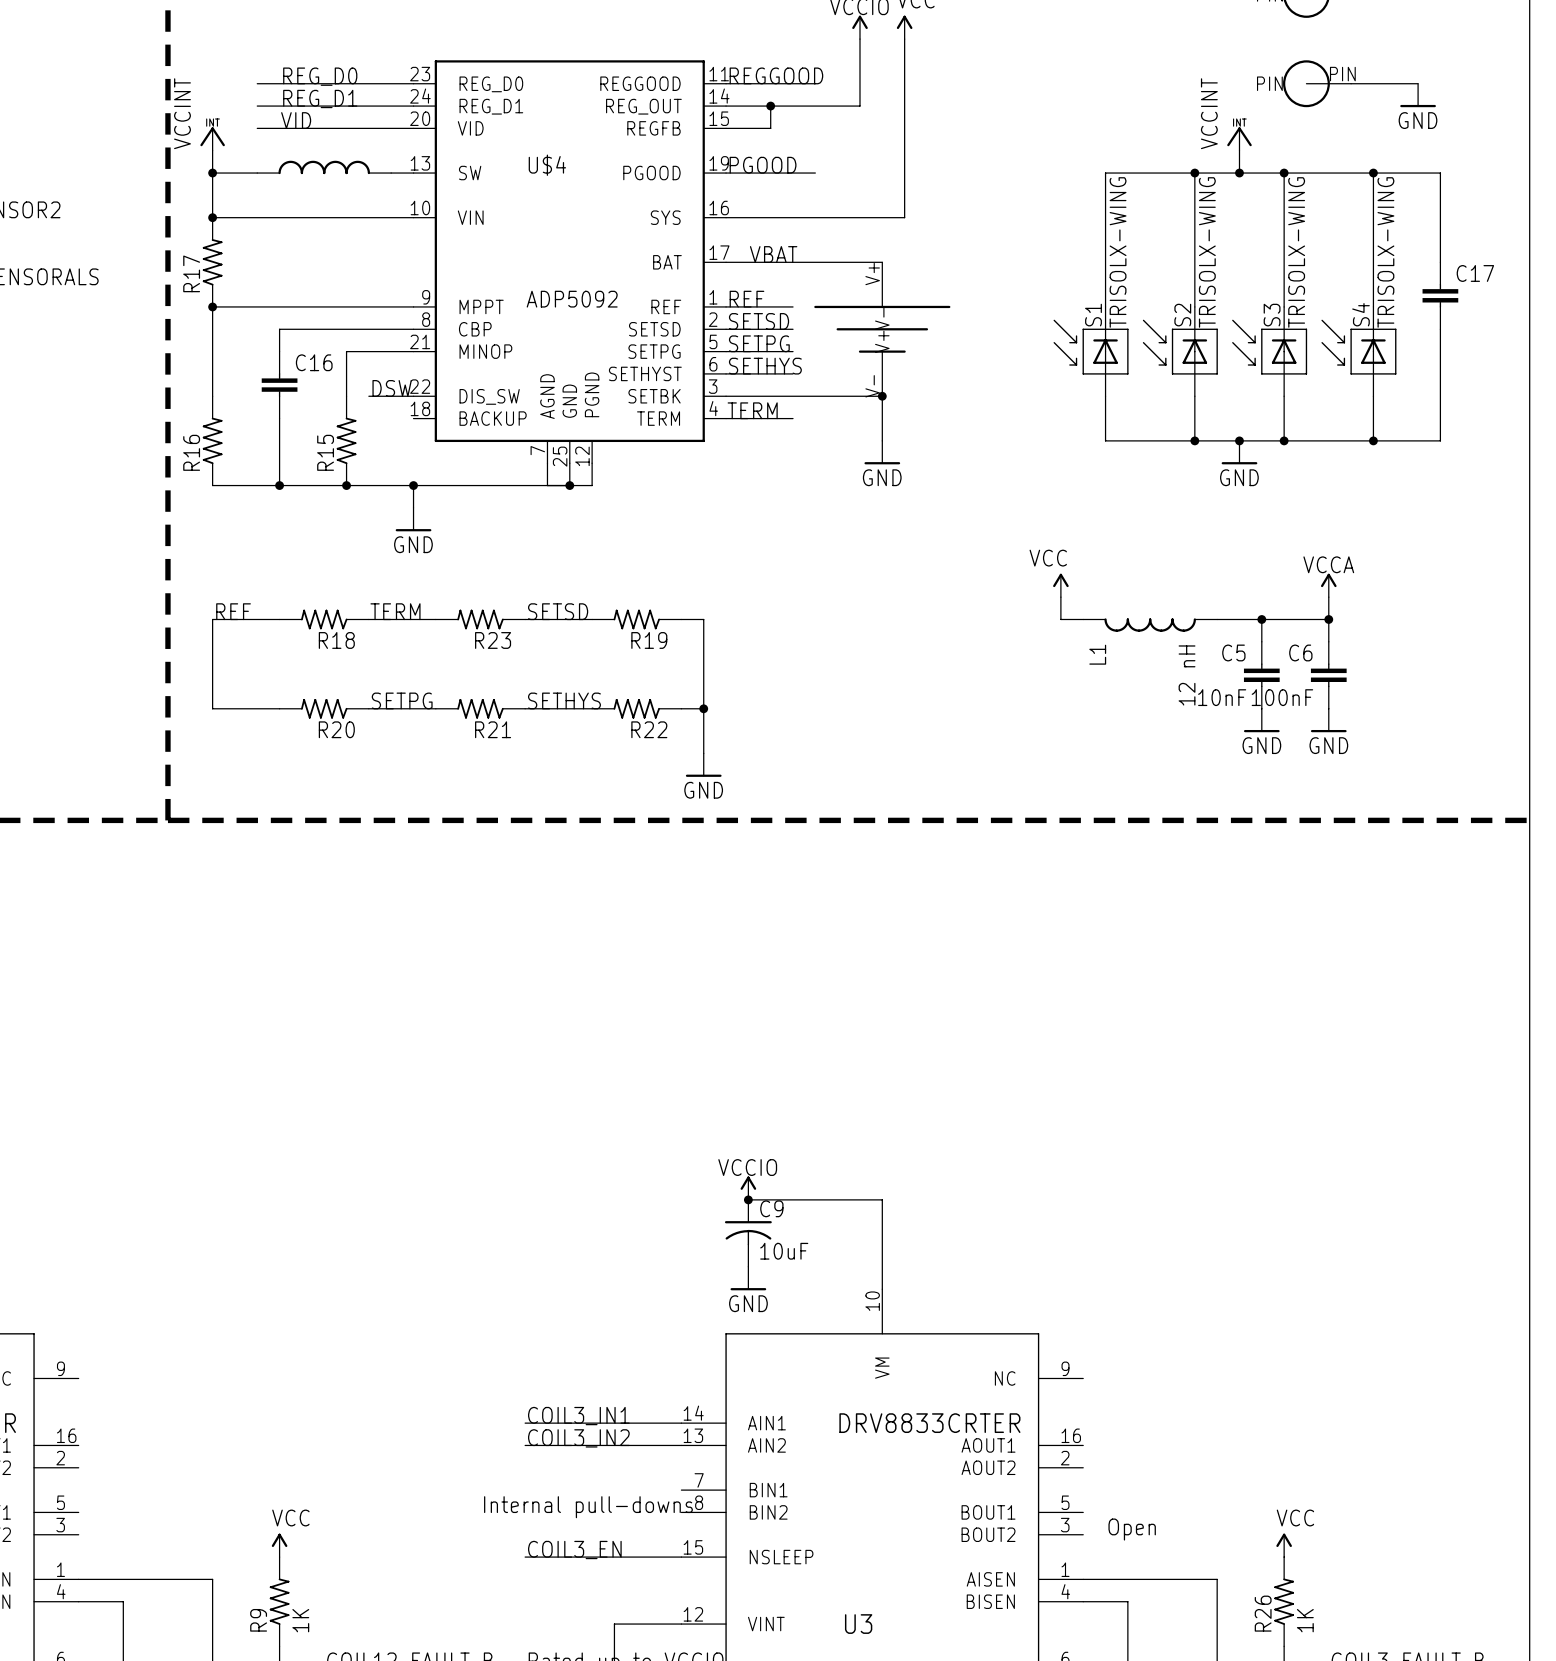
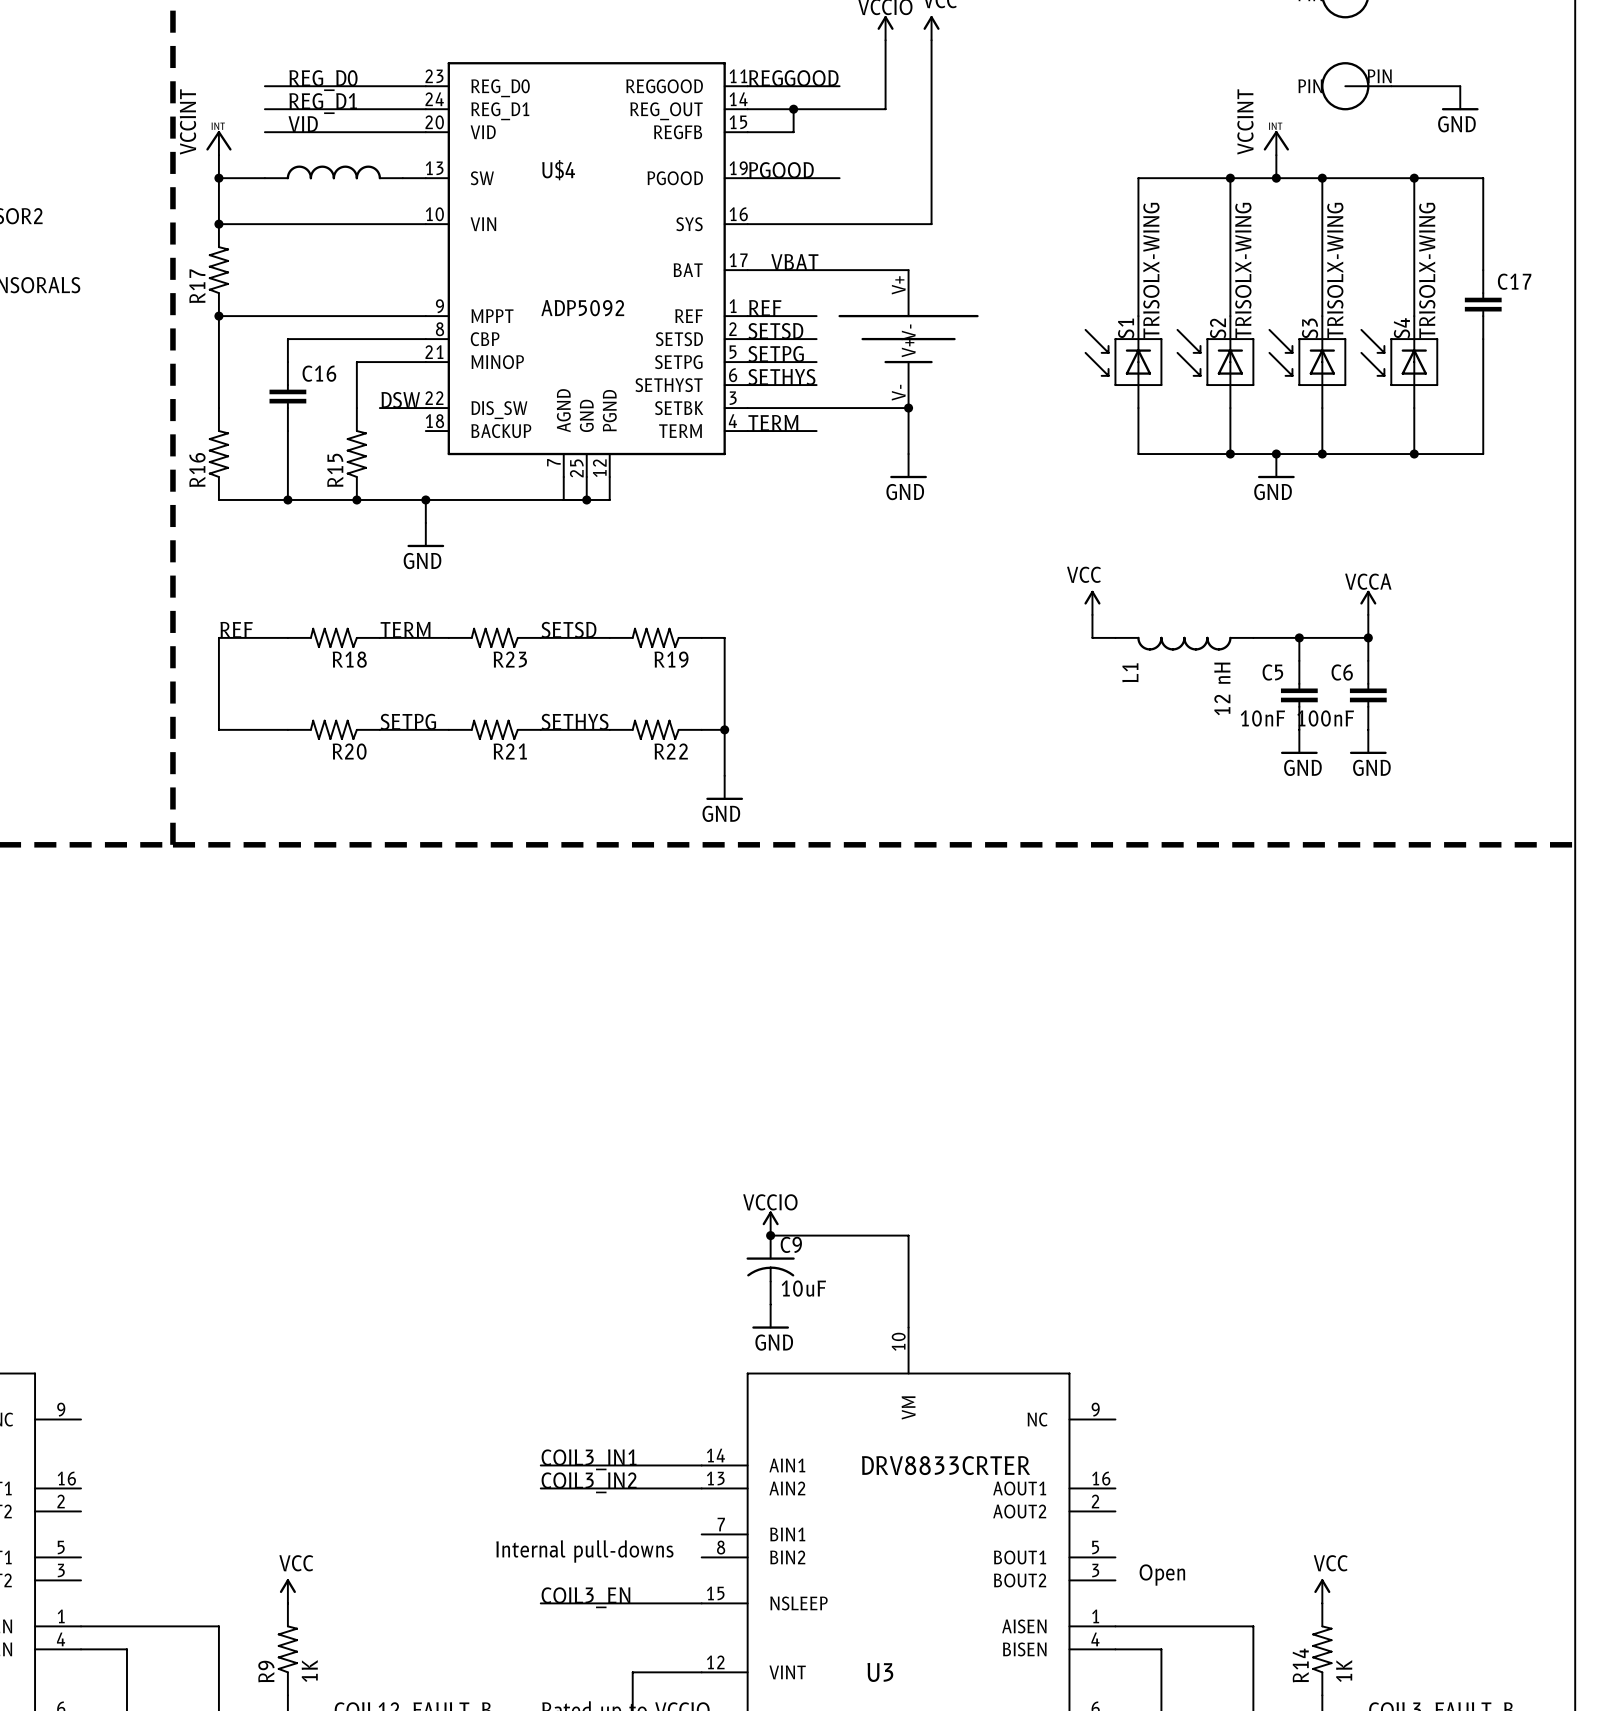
R26: 1K (1284, 1601) -> none
R14: none -> 1K (1322, 1649)

